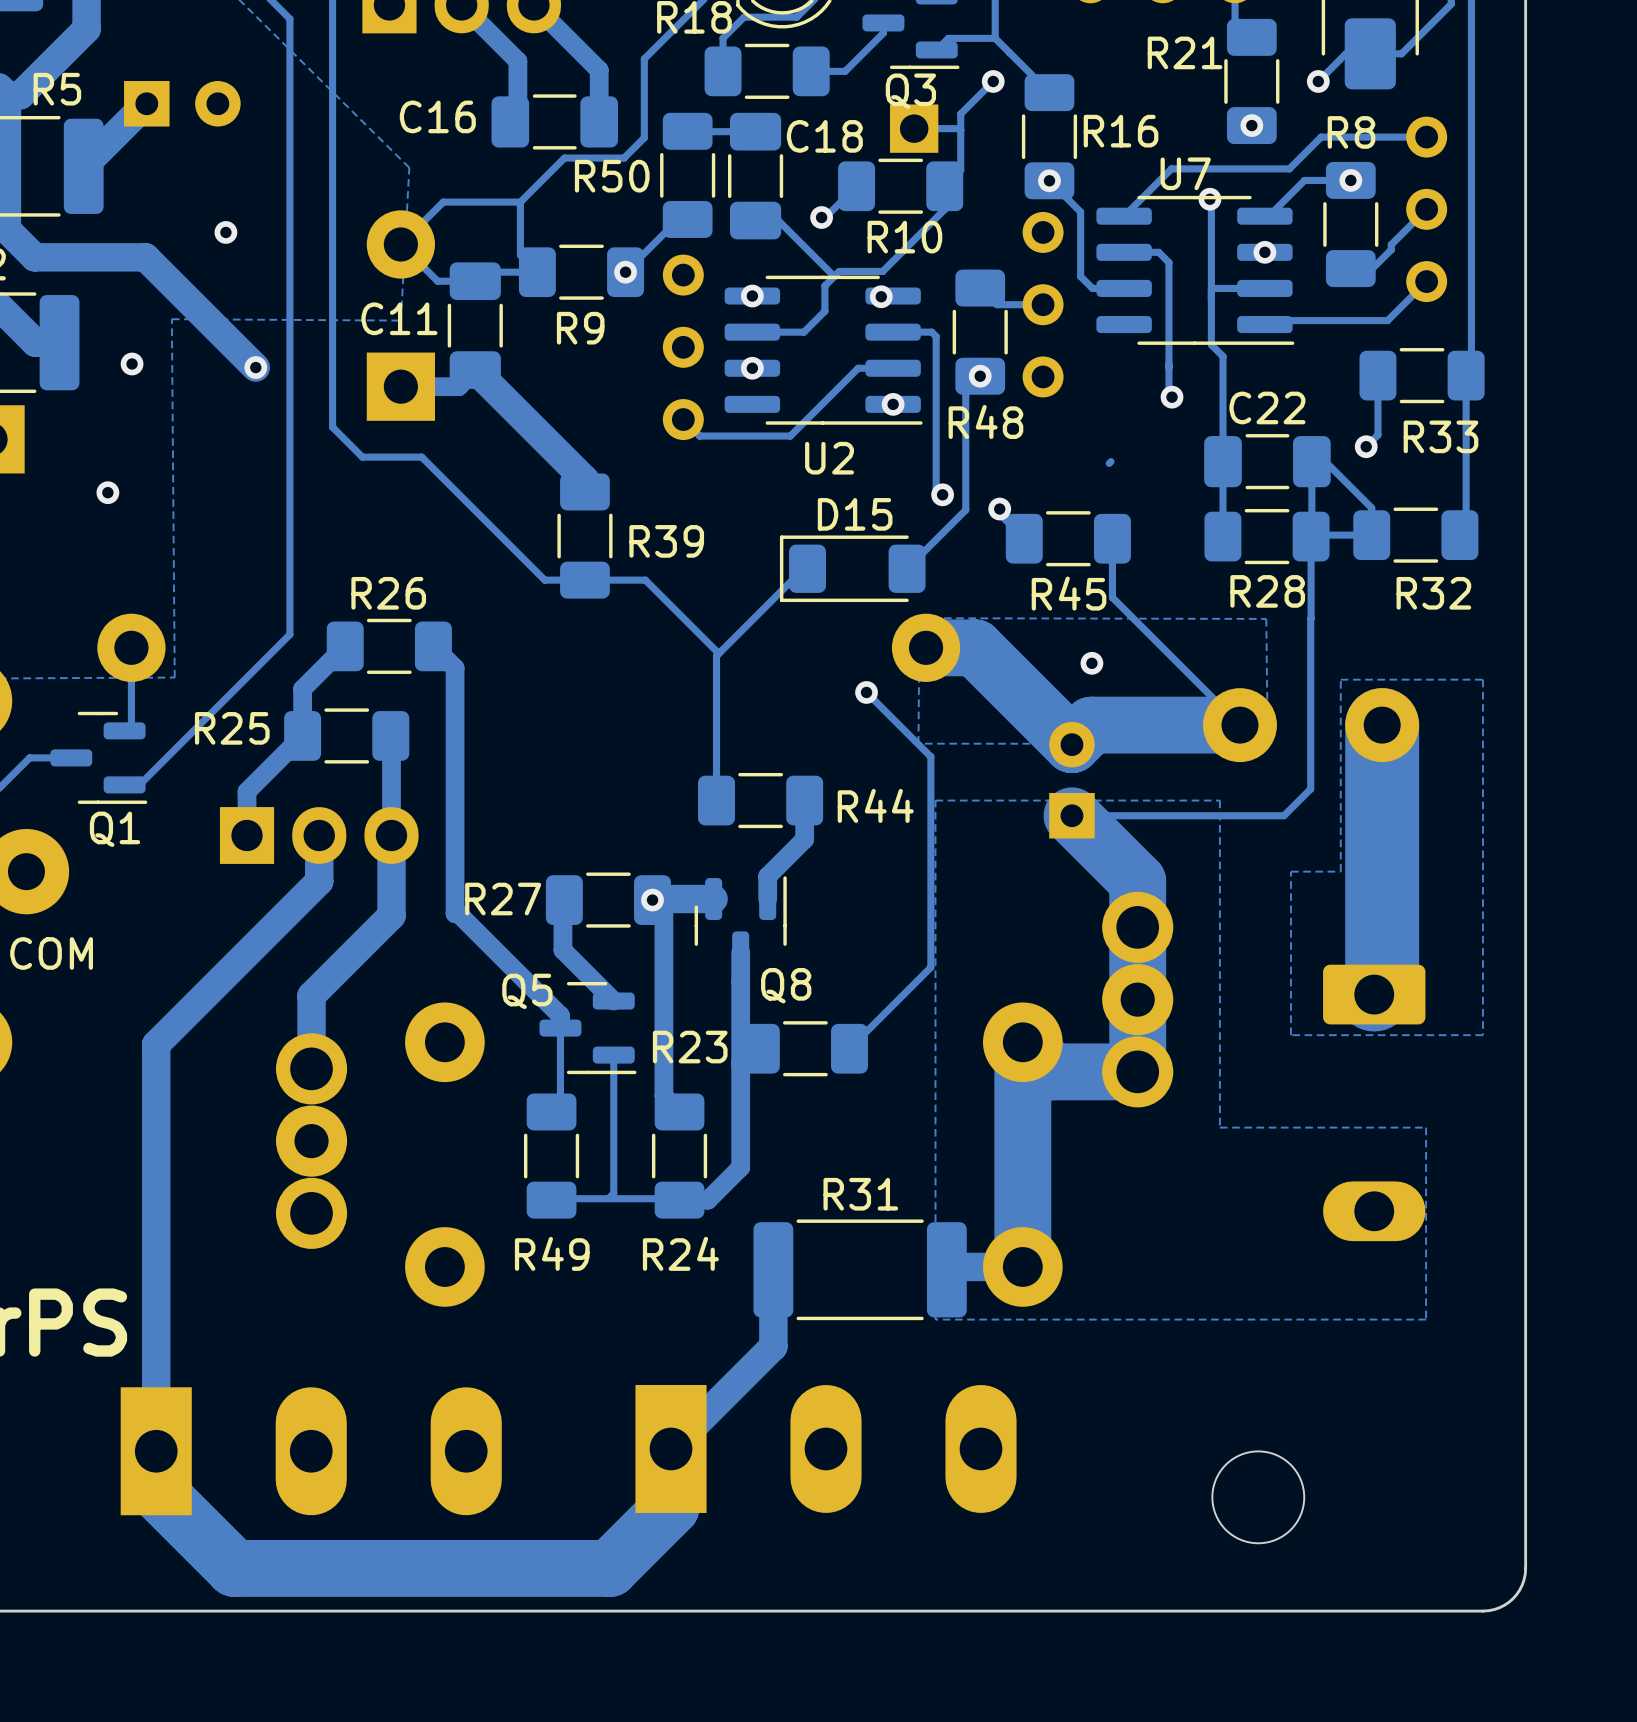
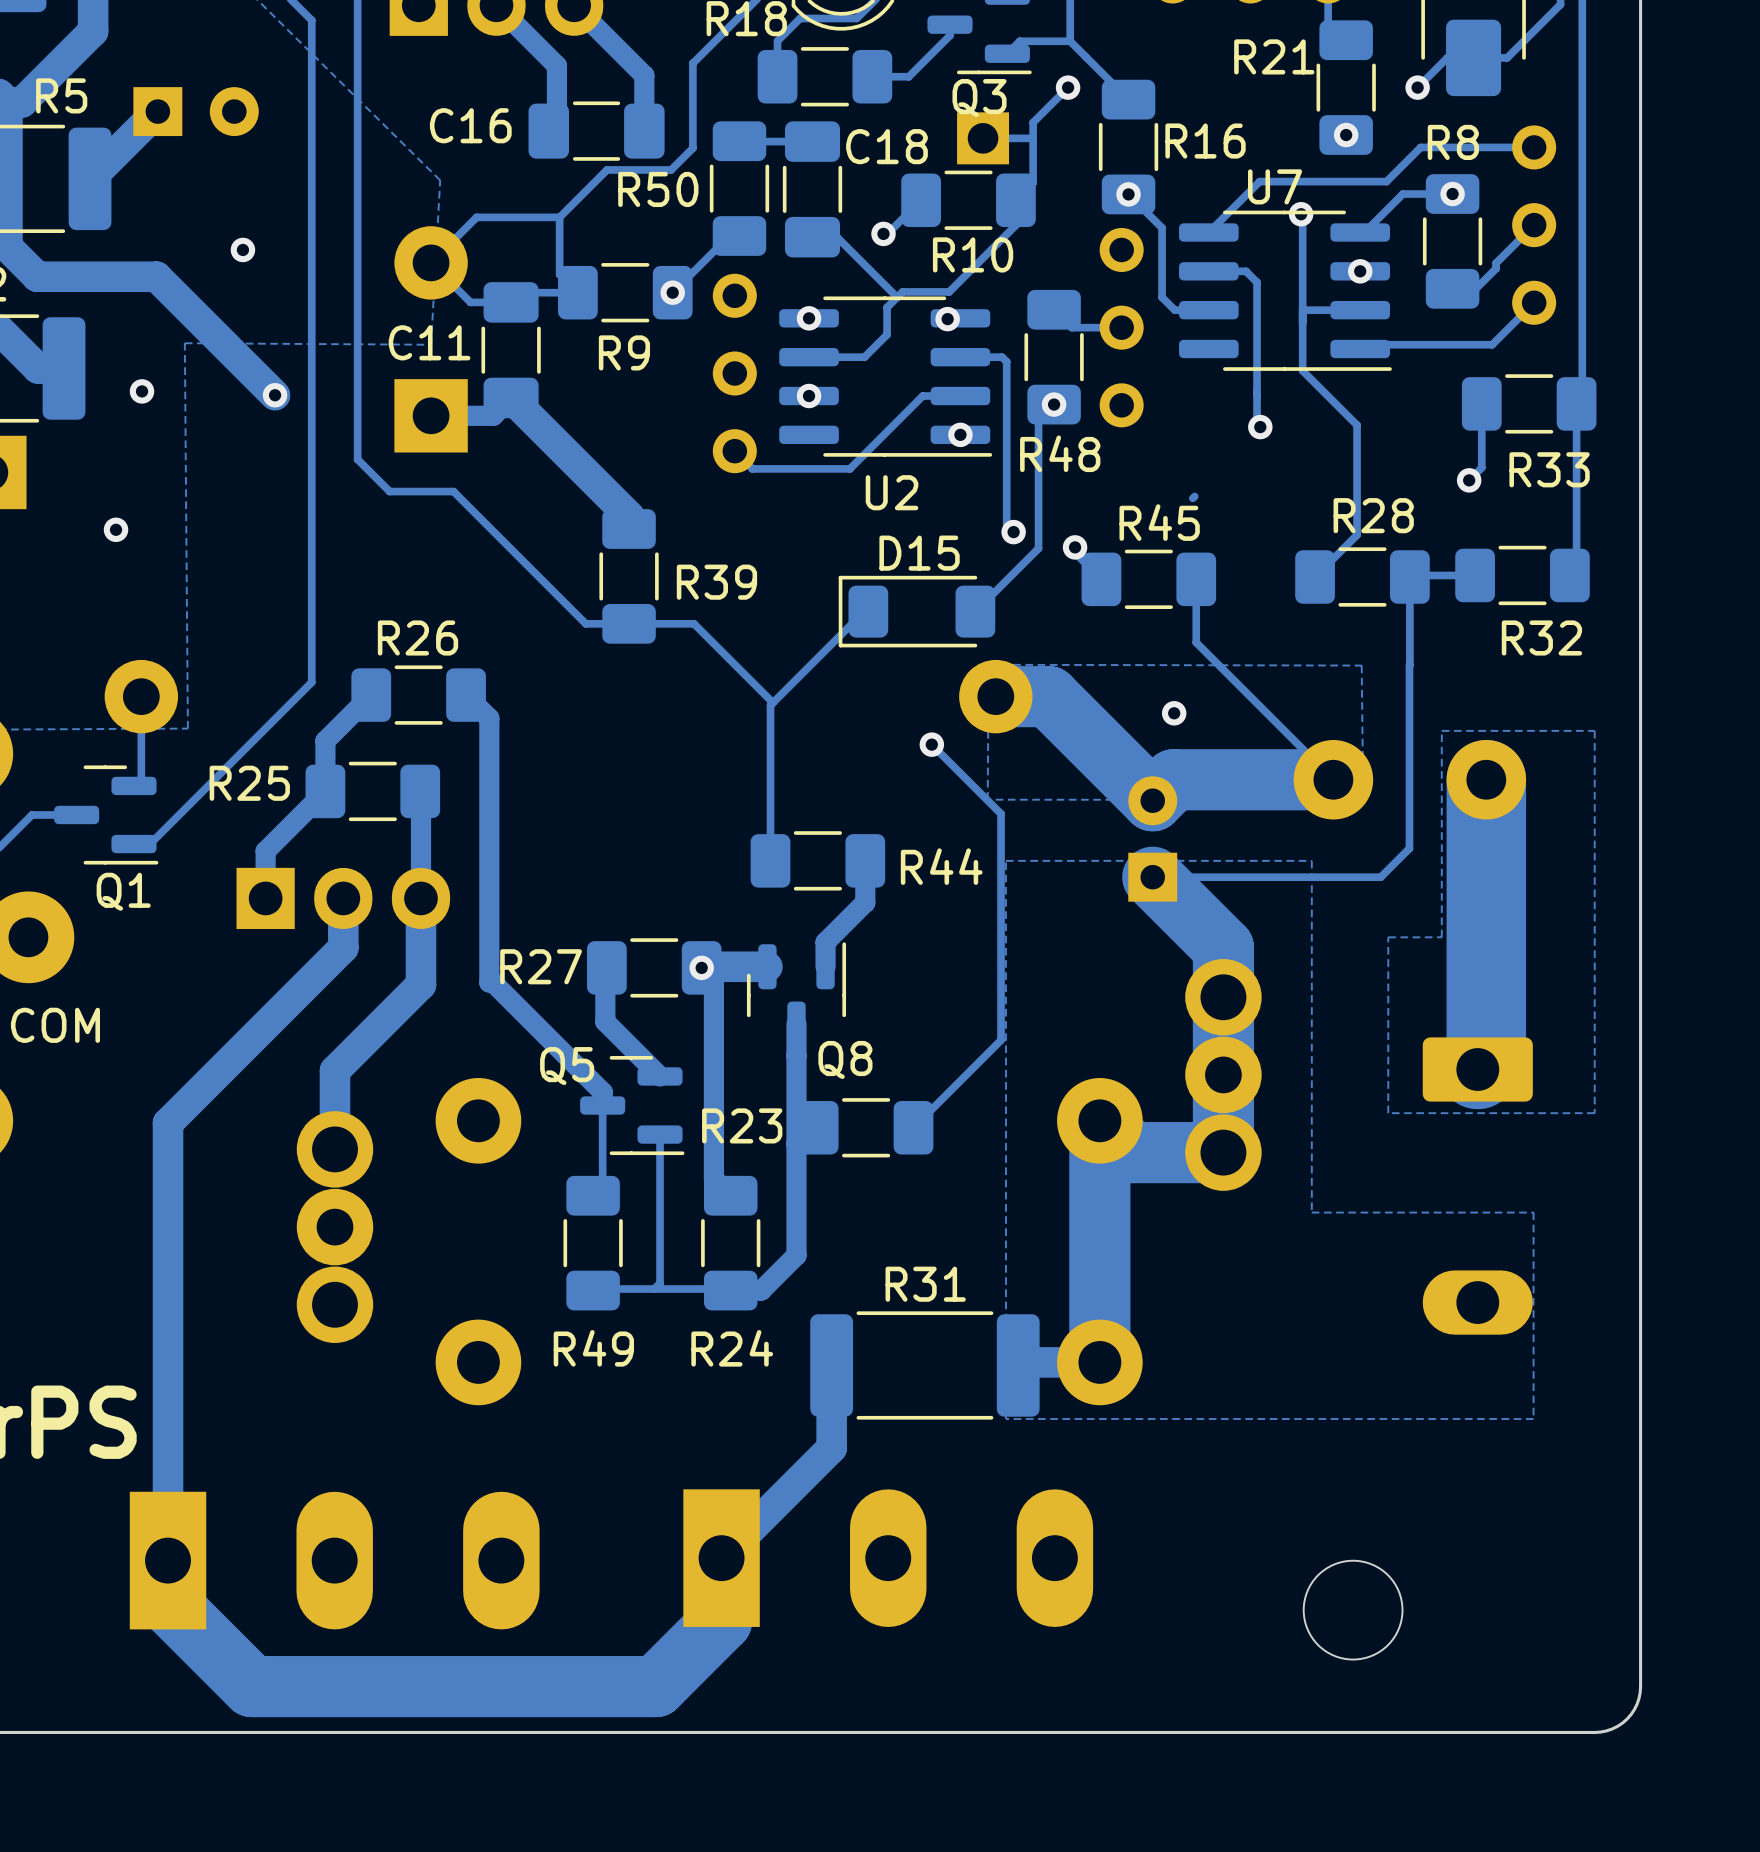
track: (1223, 356) (1223, 536) -> (1315, 383) (1357, 425) (1357, 535) (1315, 576)
C22: (1267, 461) -> none
track: (1371, 535) (1371, 508) (1325, 461) (1311, 461) (1311, 535) -> none
R28 name position: R28 (1267, 591) -> R28 (1373, 515)
R45 name position: R45 (1069, 593) -> R45 (1159, 522)

